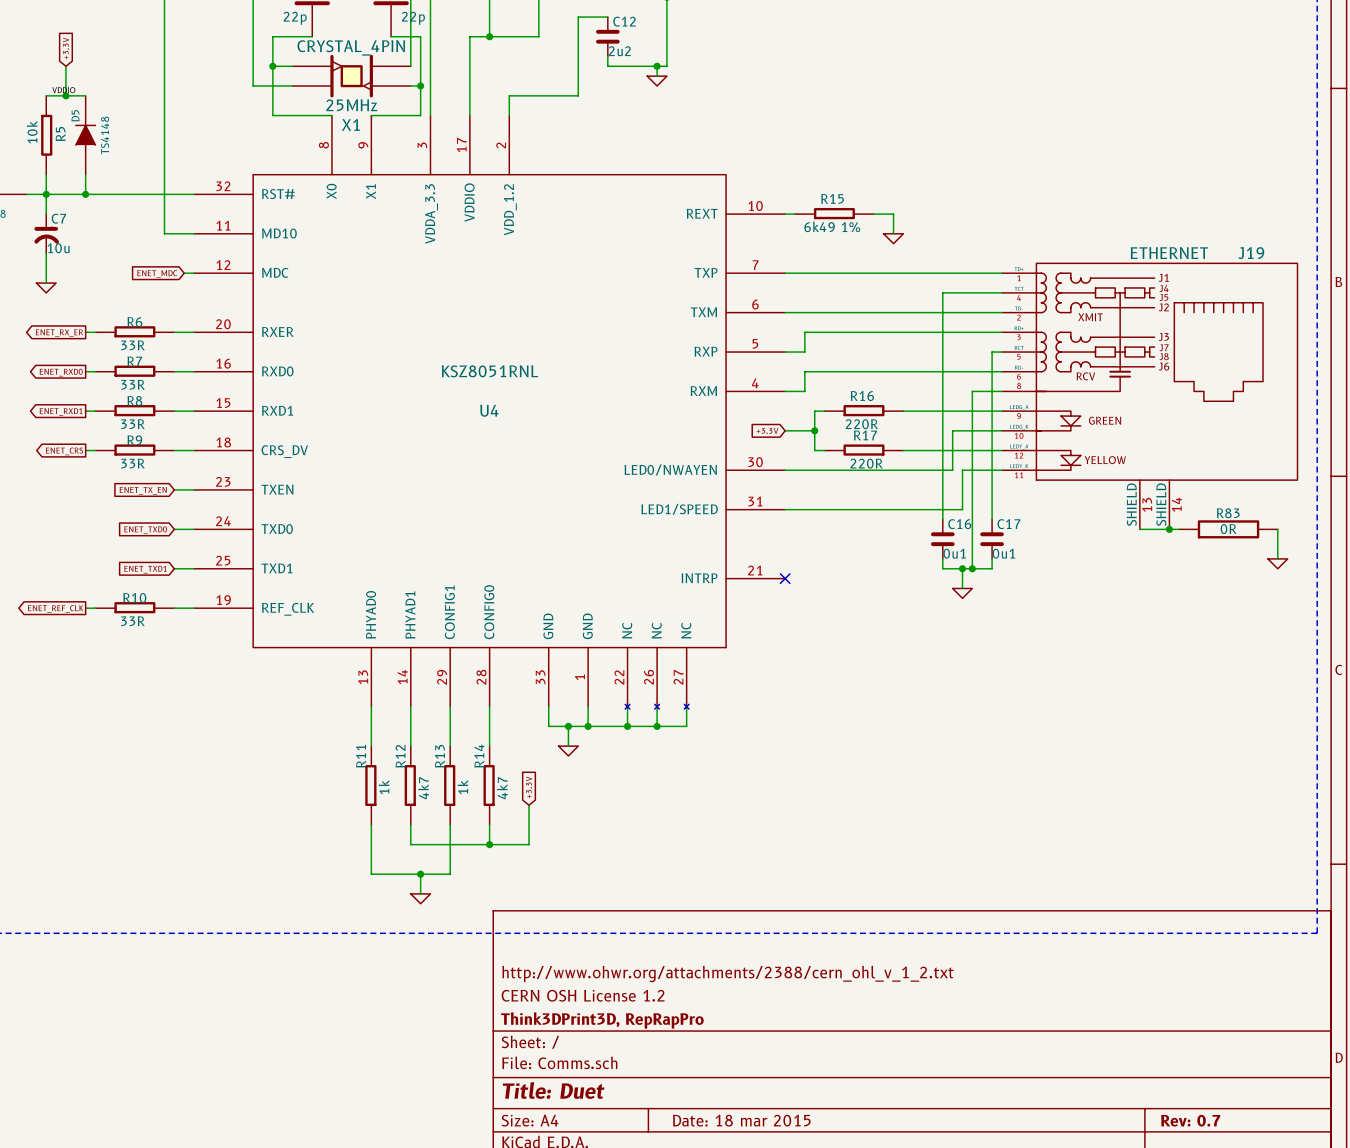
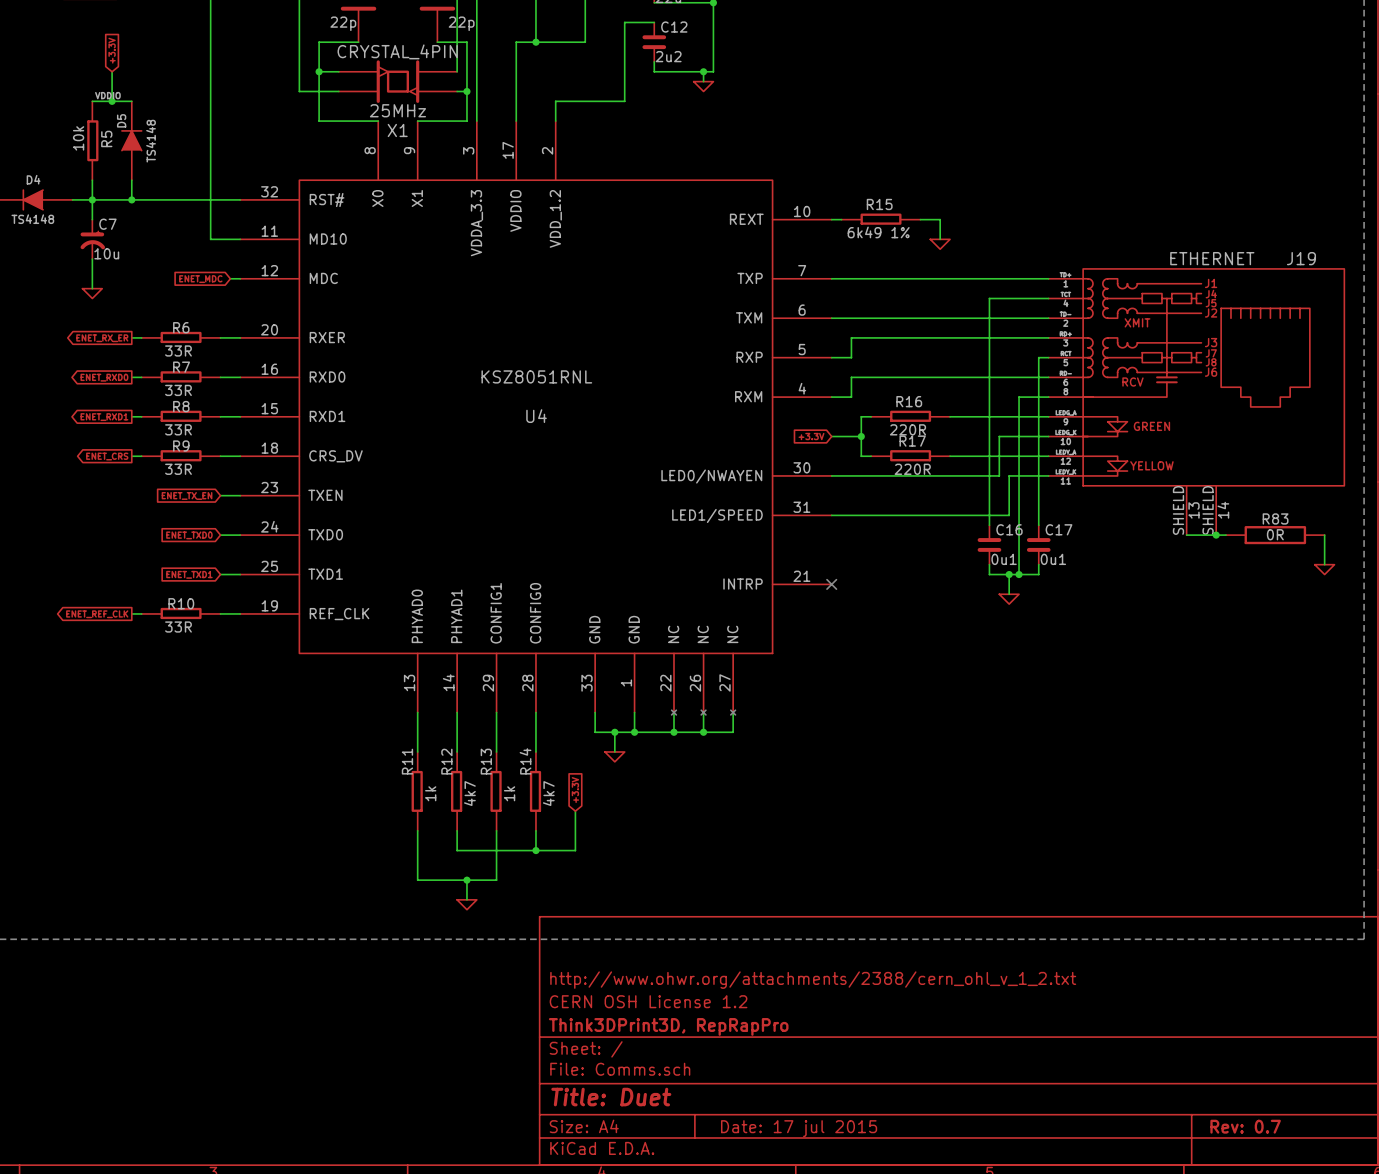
title block: Date: 18 mar 2015 (741, 1120) -> Date: 17 jul 2015 (799, 1128)

